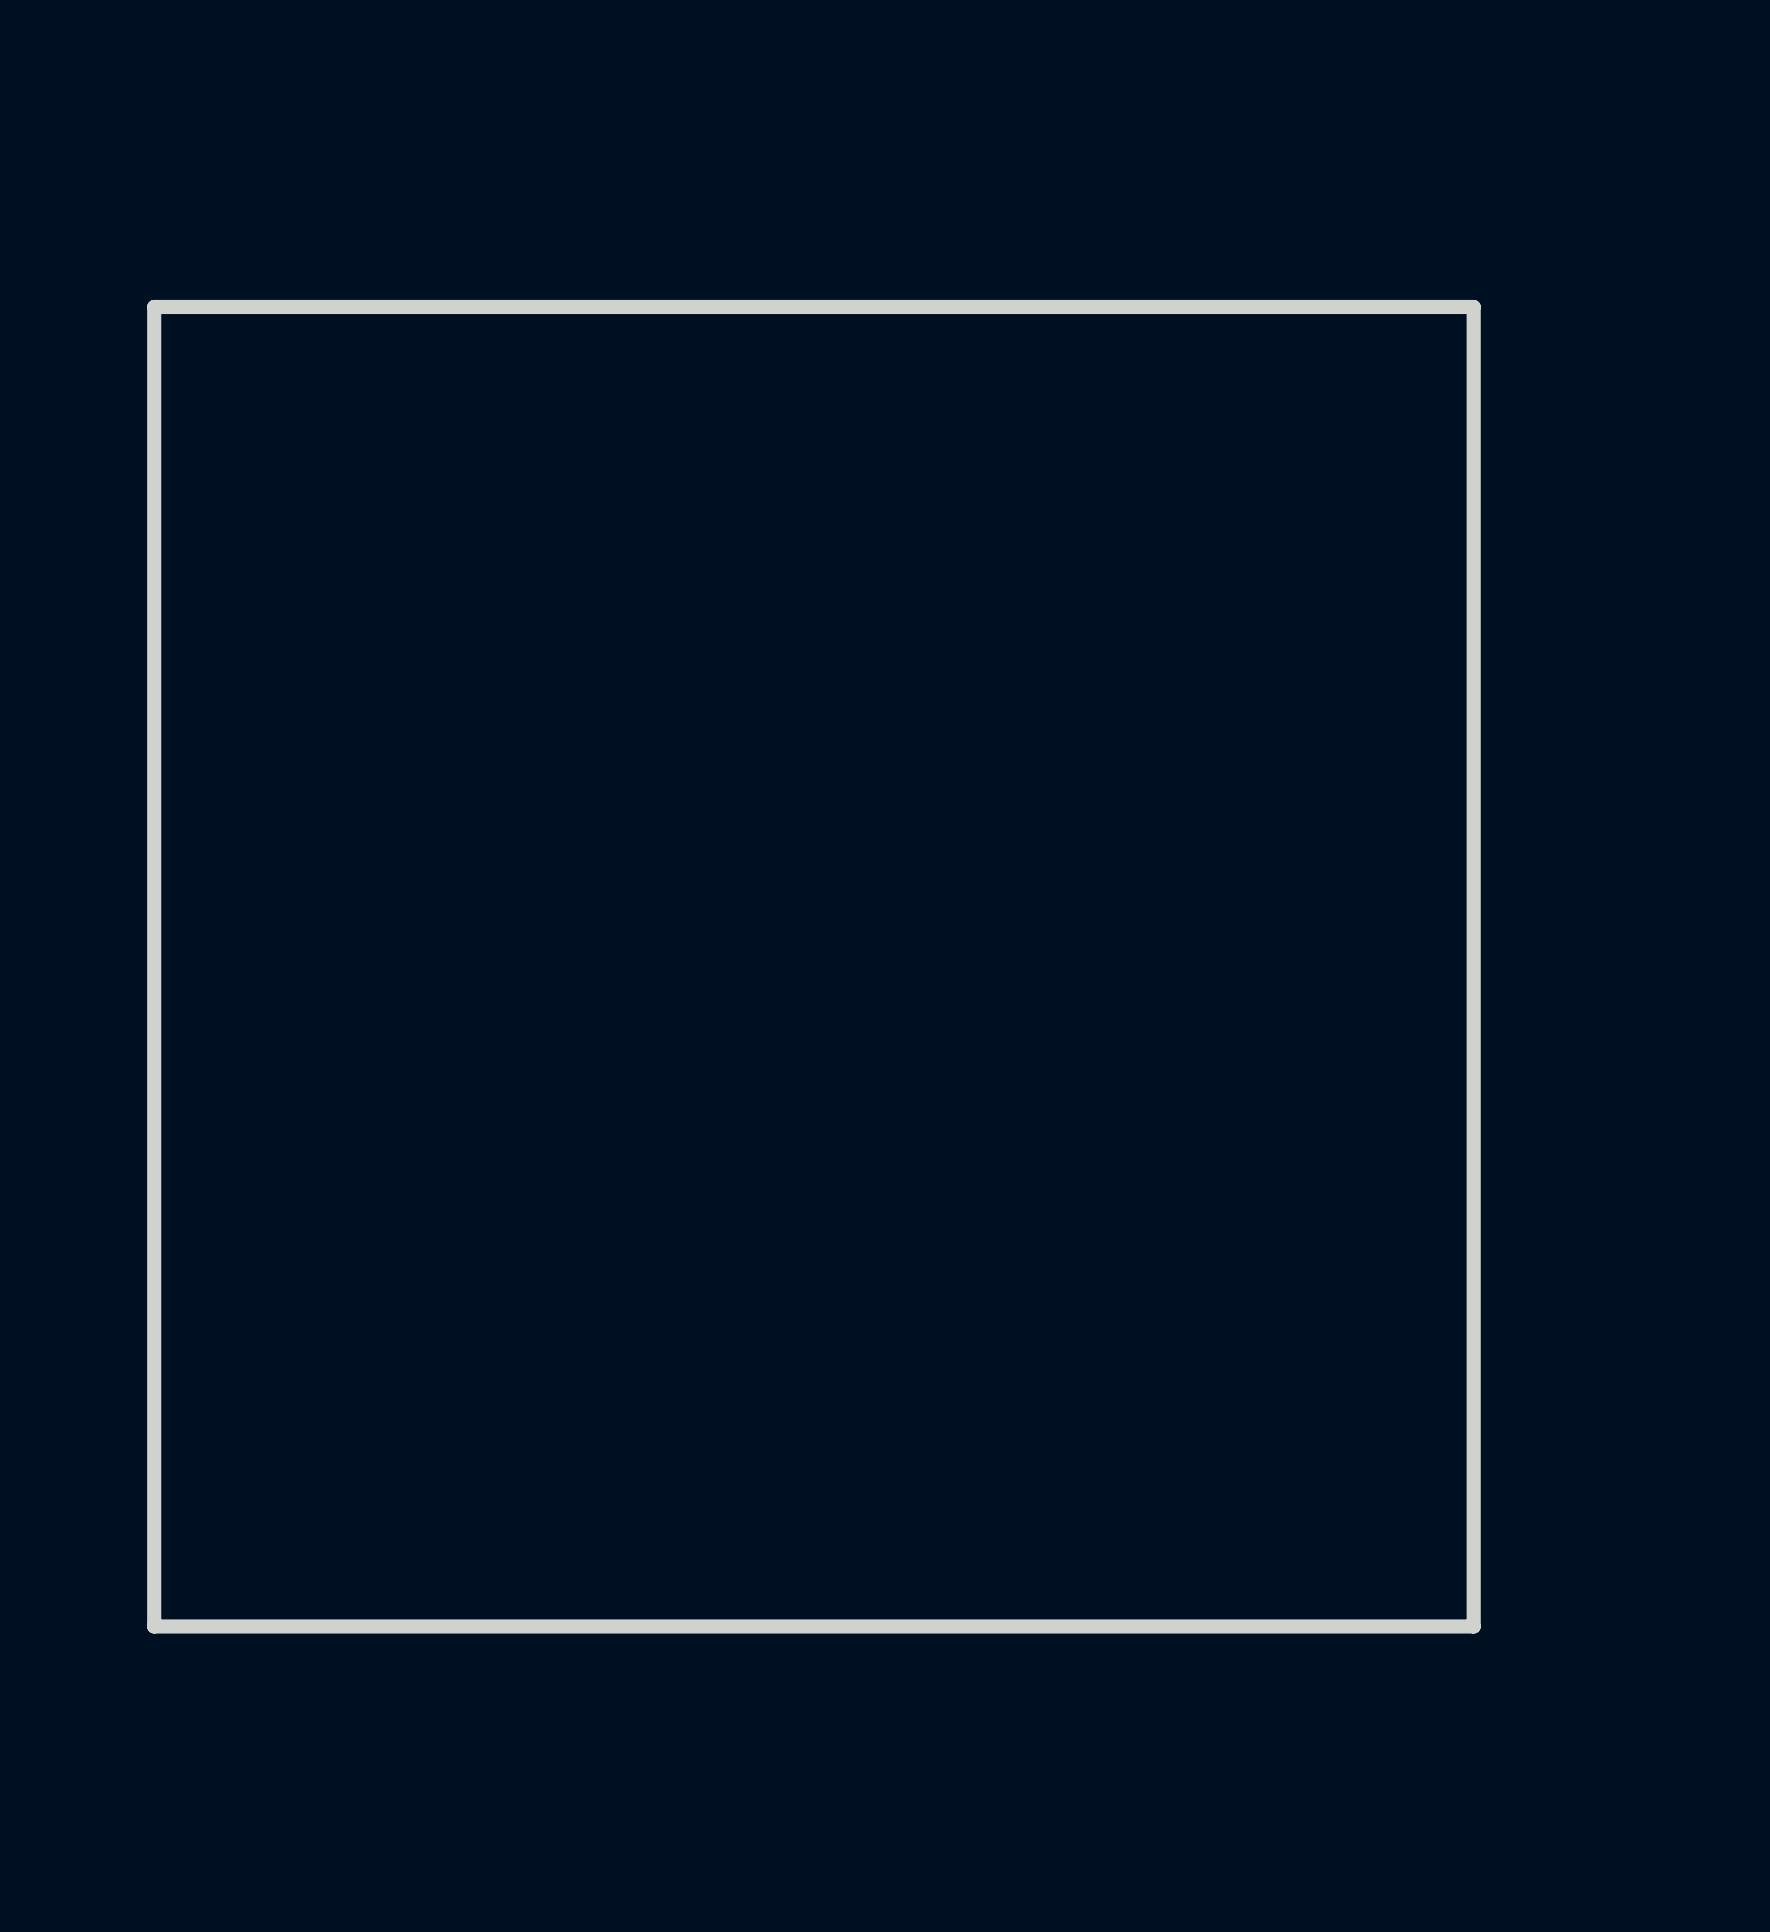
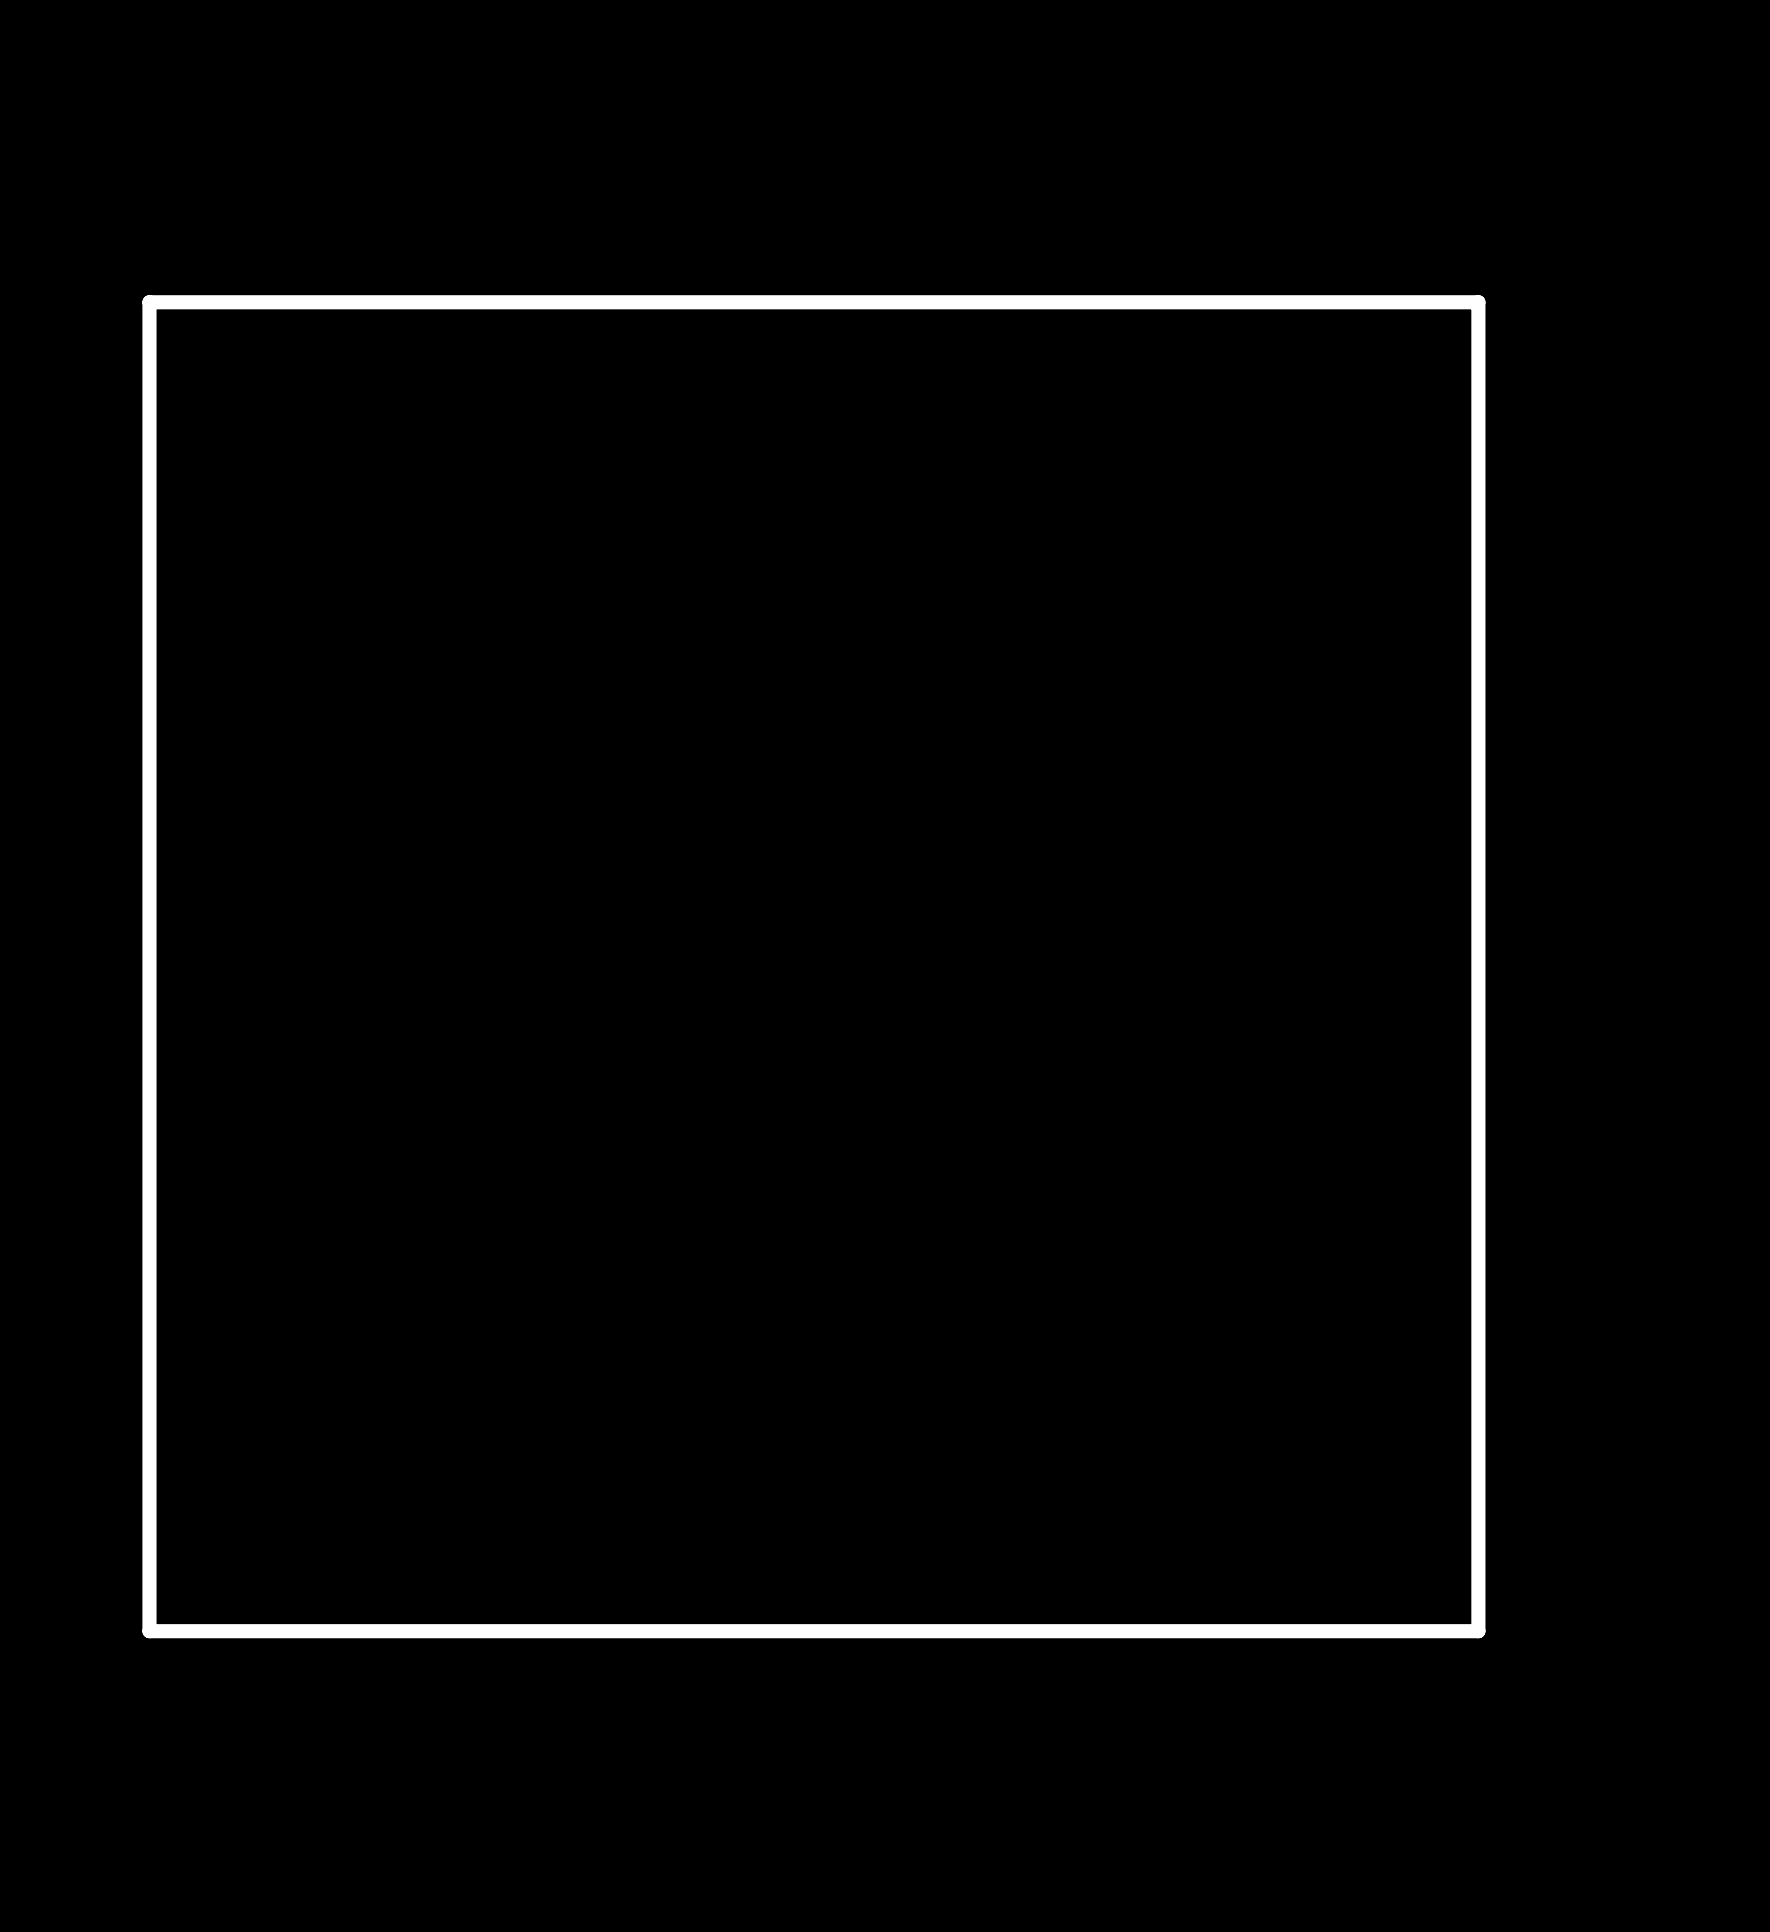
drawing shape: [147, 299, 1481, 1634] -> [142, 295, 1486, 1639]

